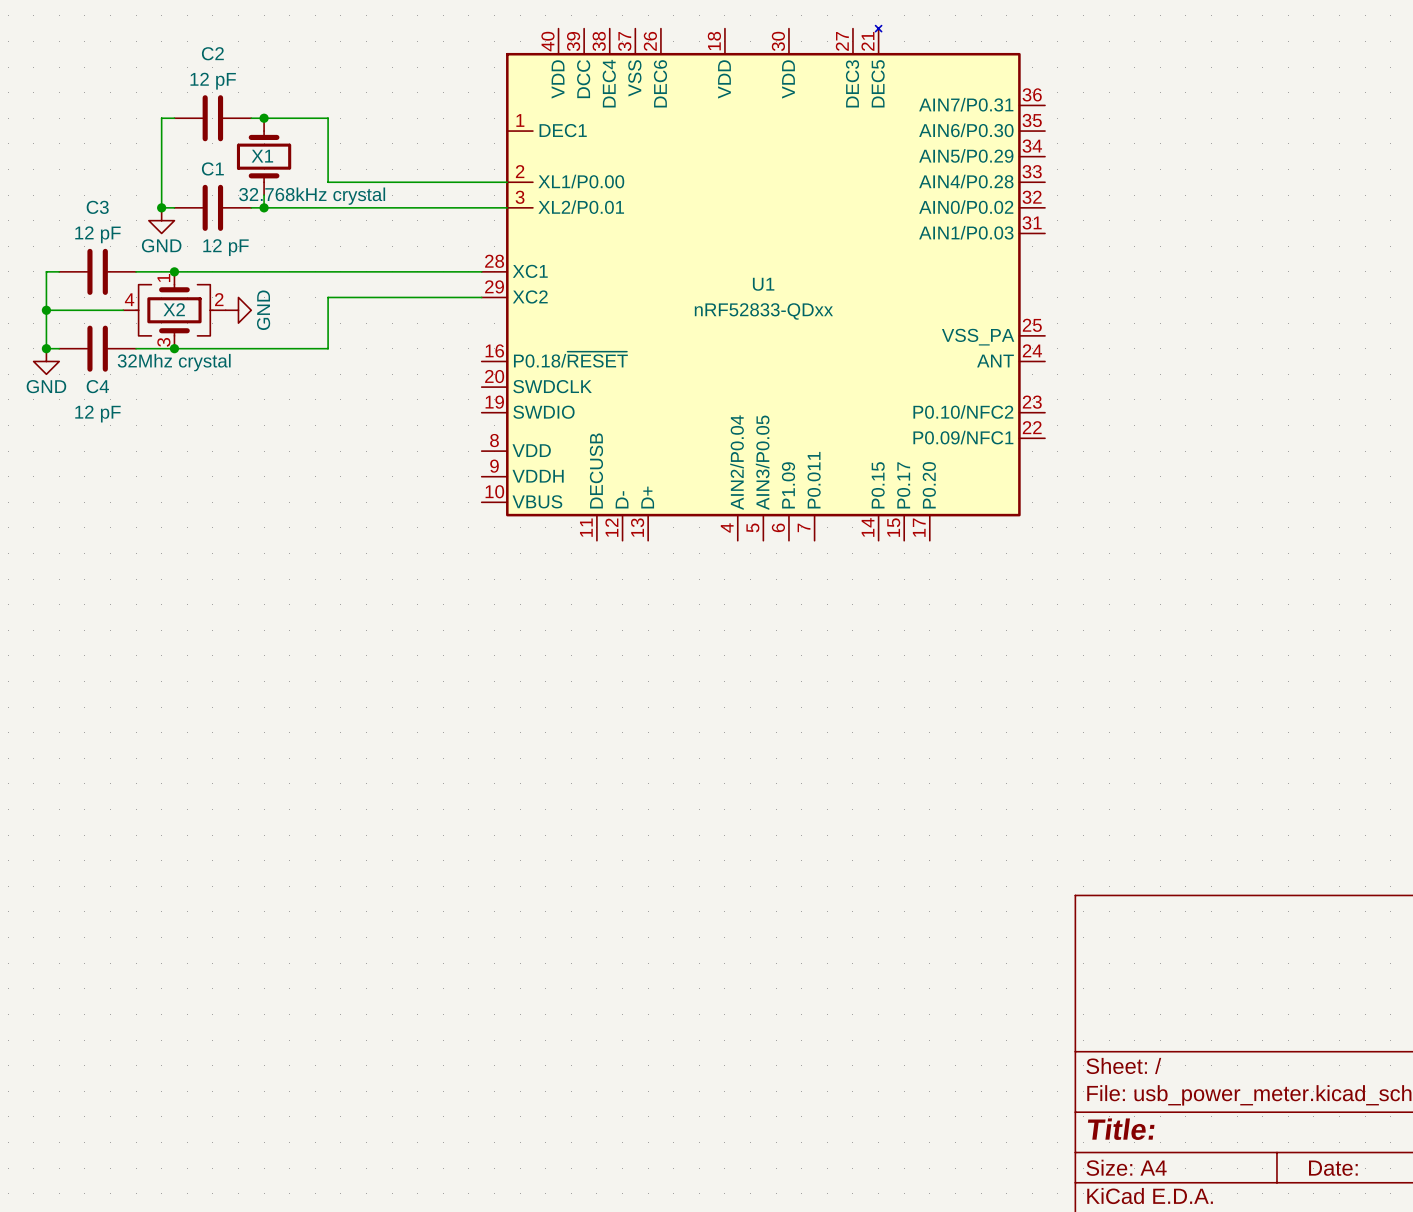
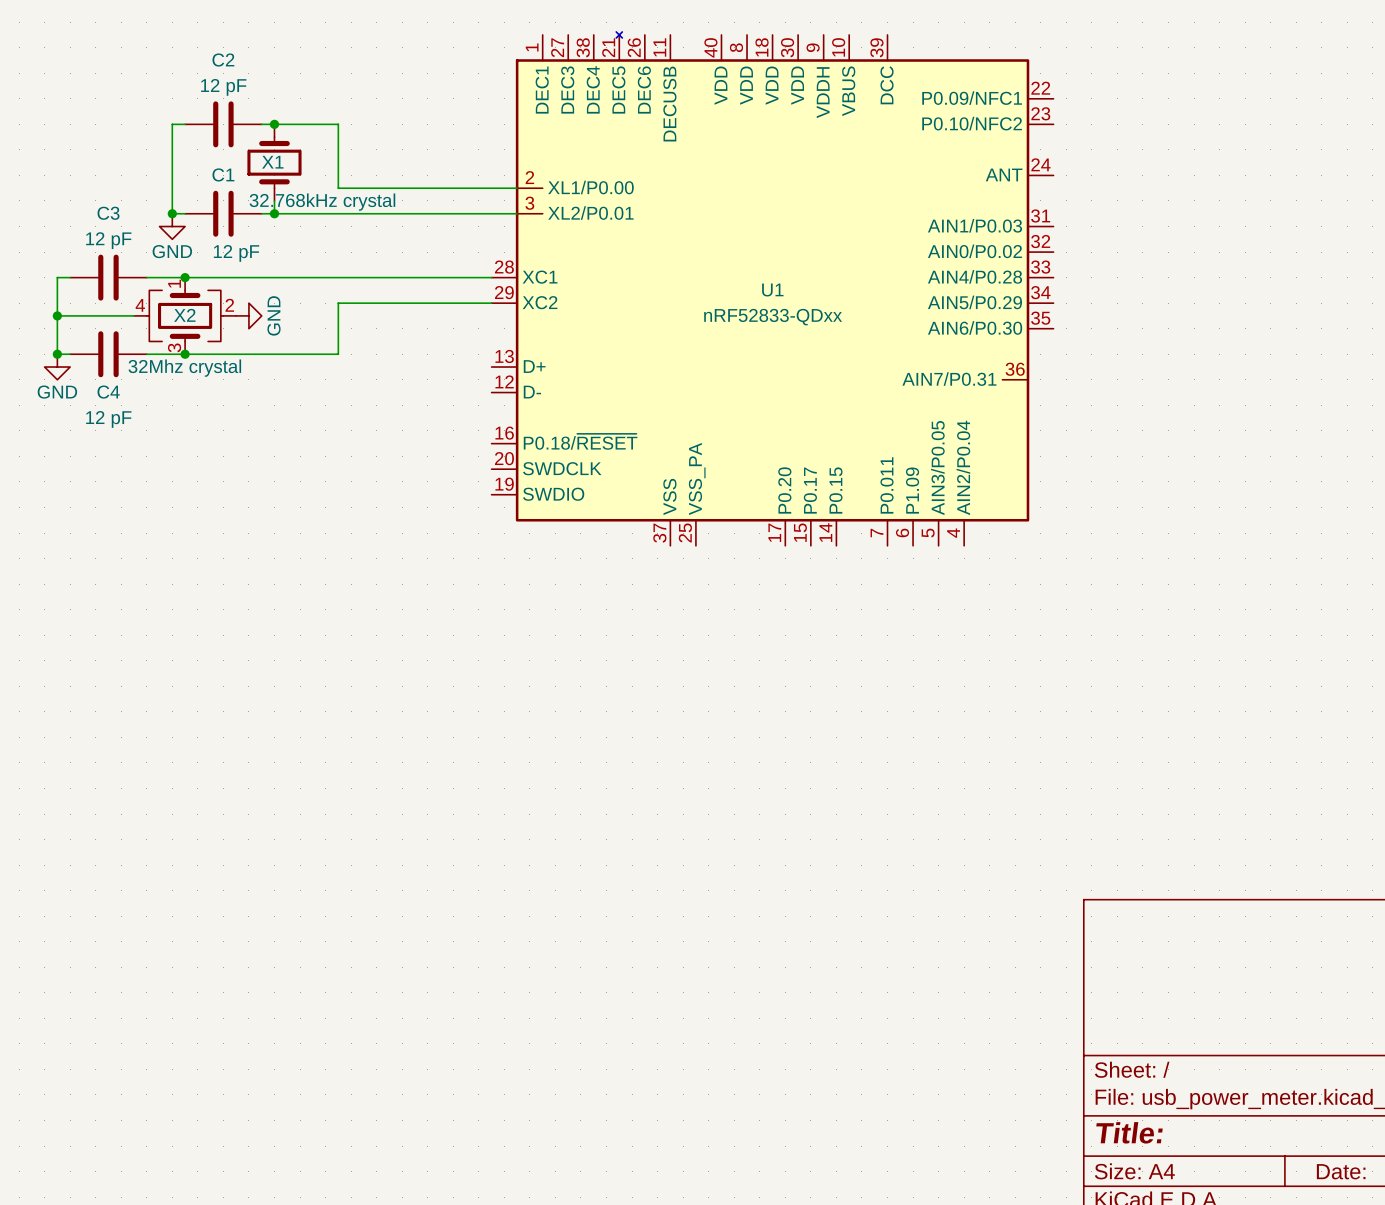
U1 symbol: [481, 25, 1046, 541] -> [491, 31, 1054, 546]

